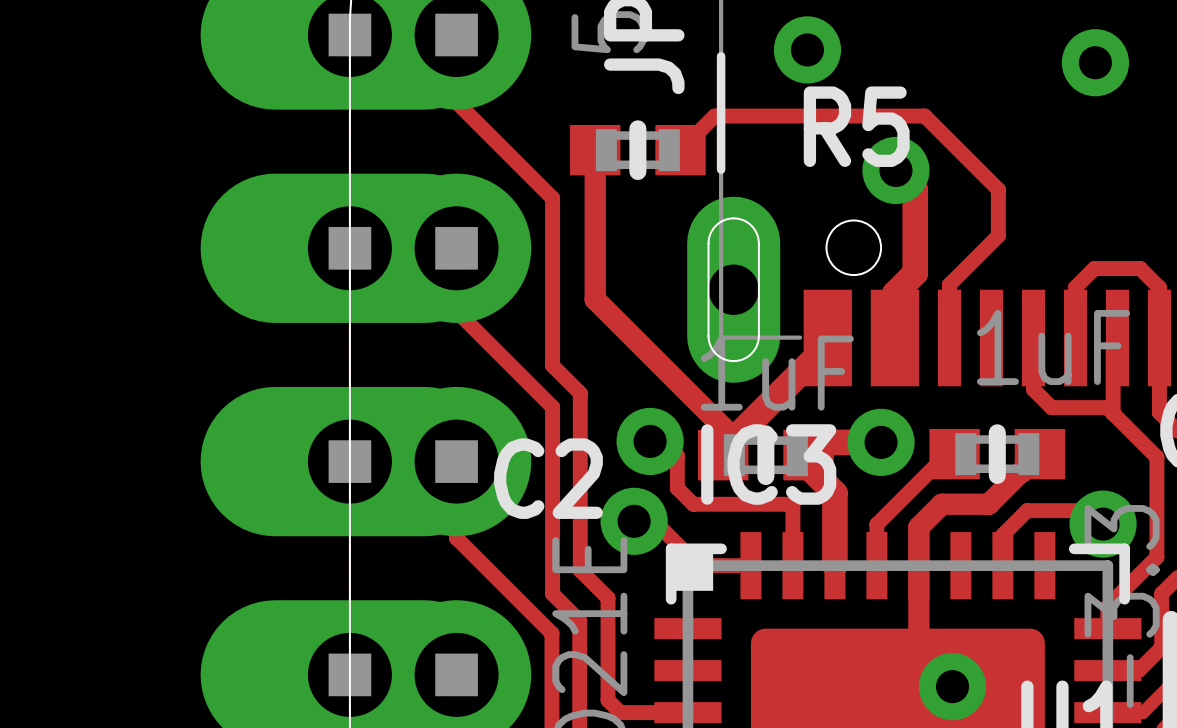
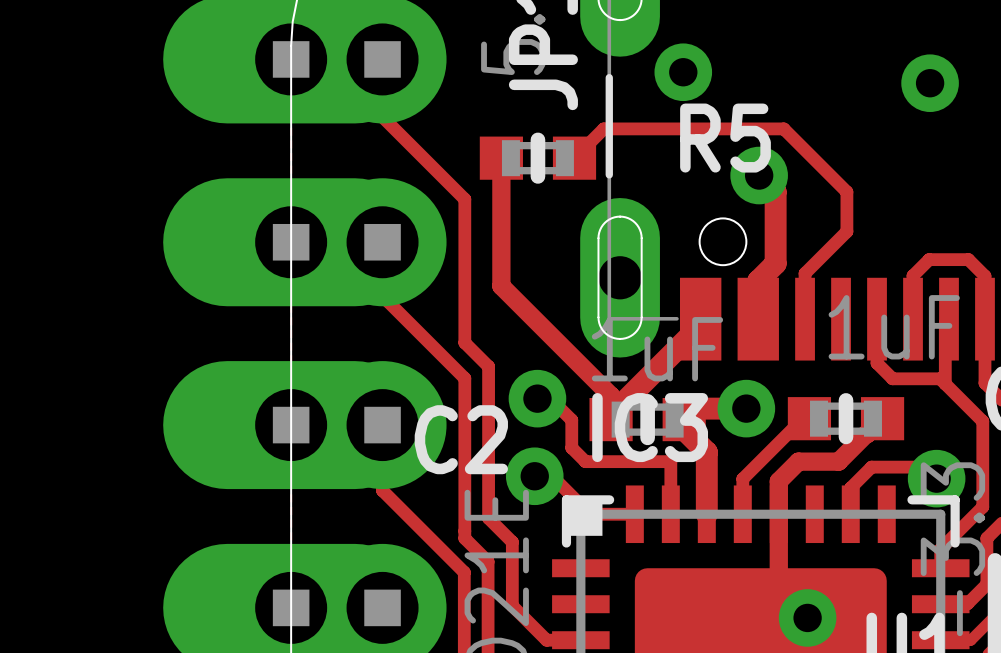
via position: (650, 441) -> (537, 398)
track: (608, 672) (608, 700) (620, 712) (648, 712) -> (512, 605) (546, 640)

